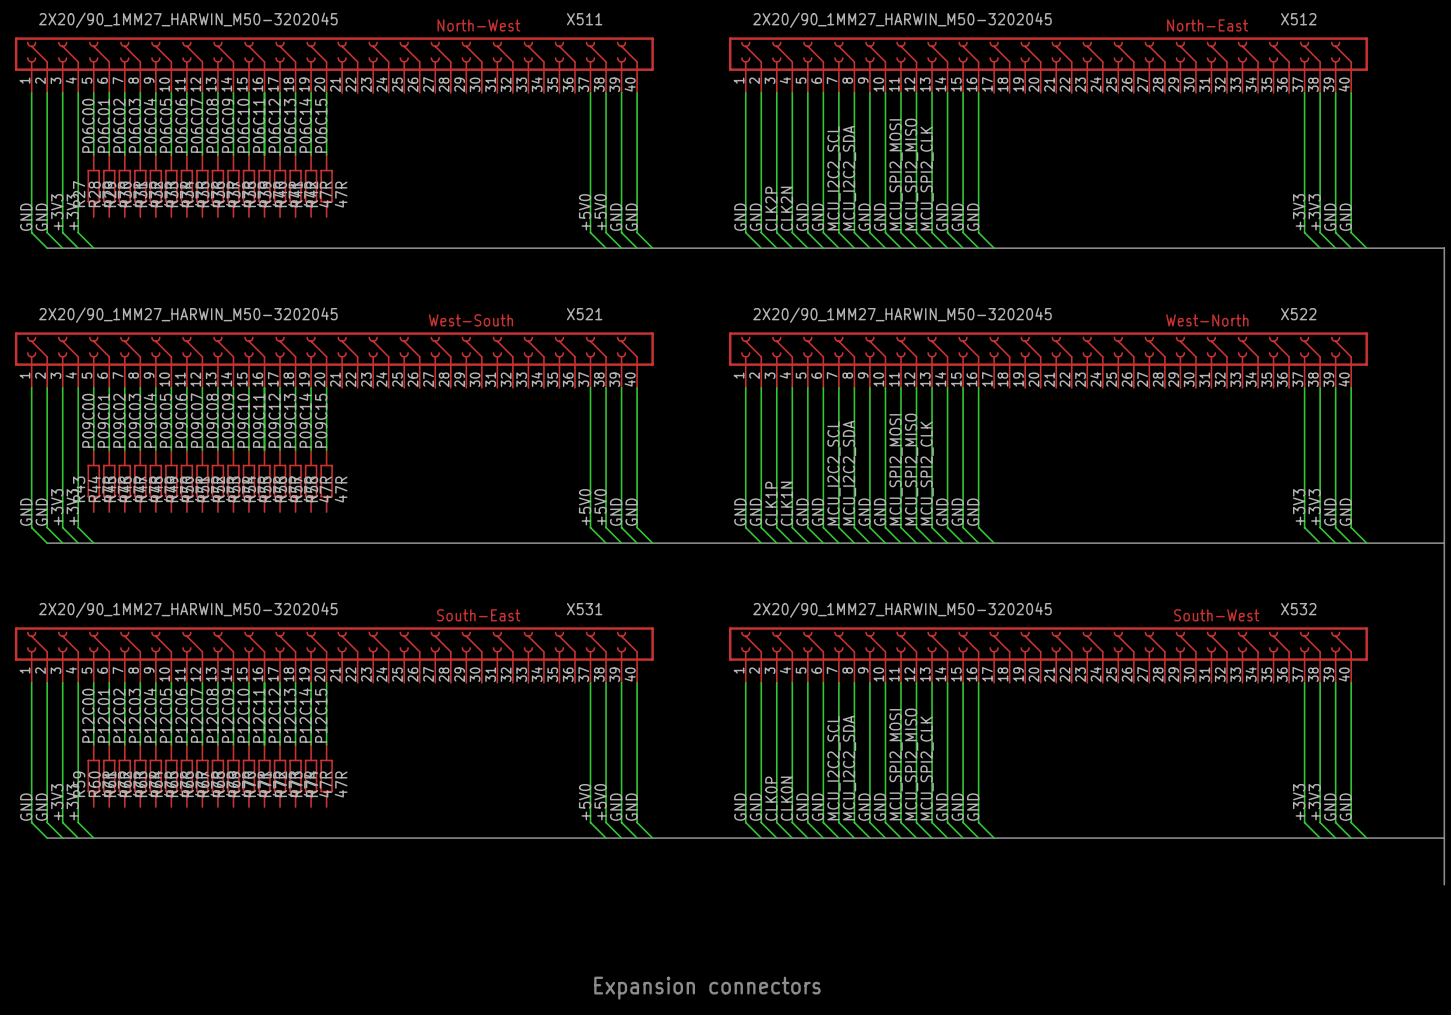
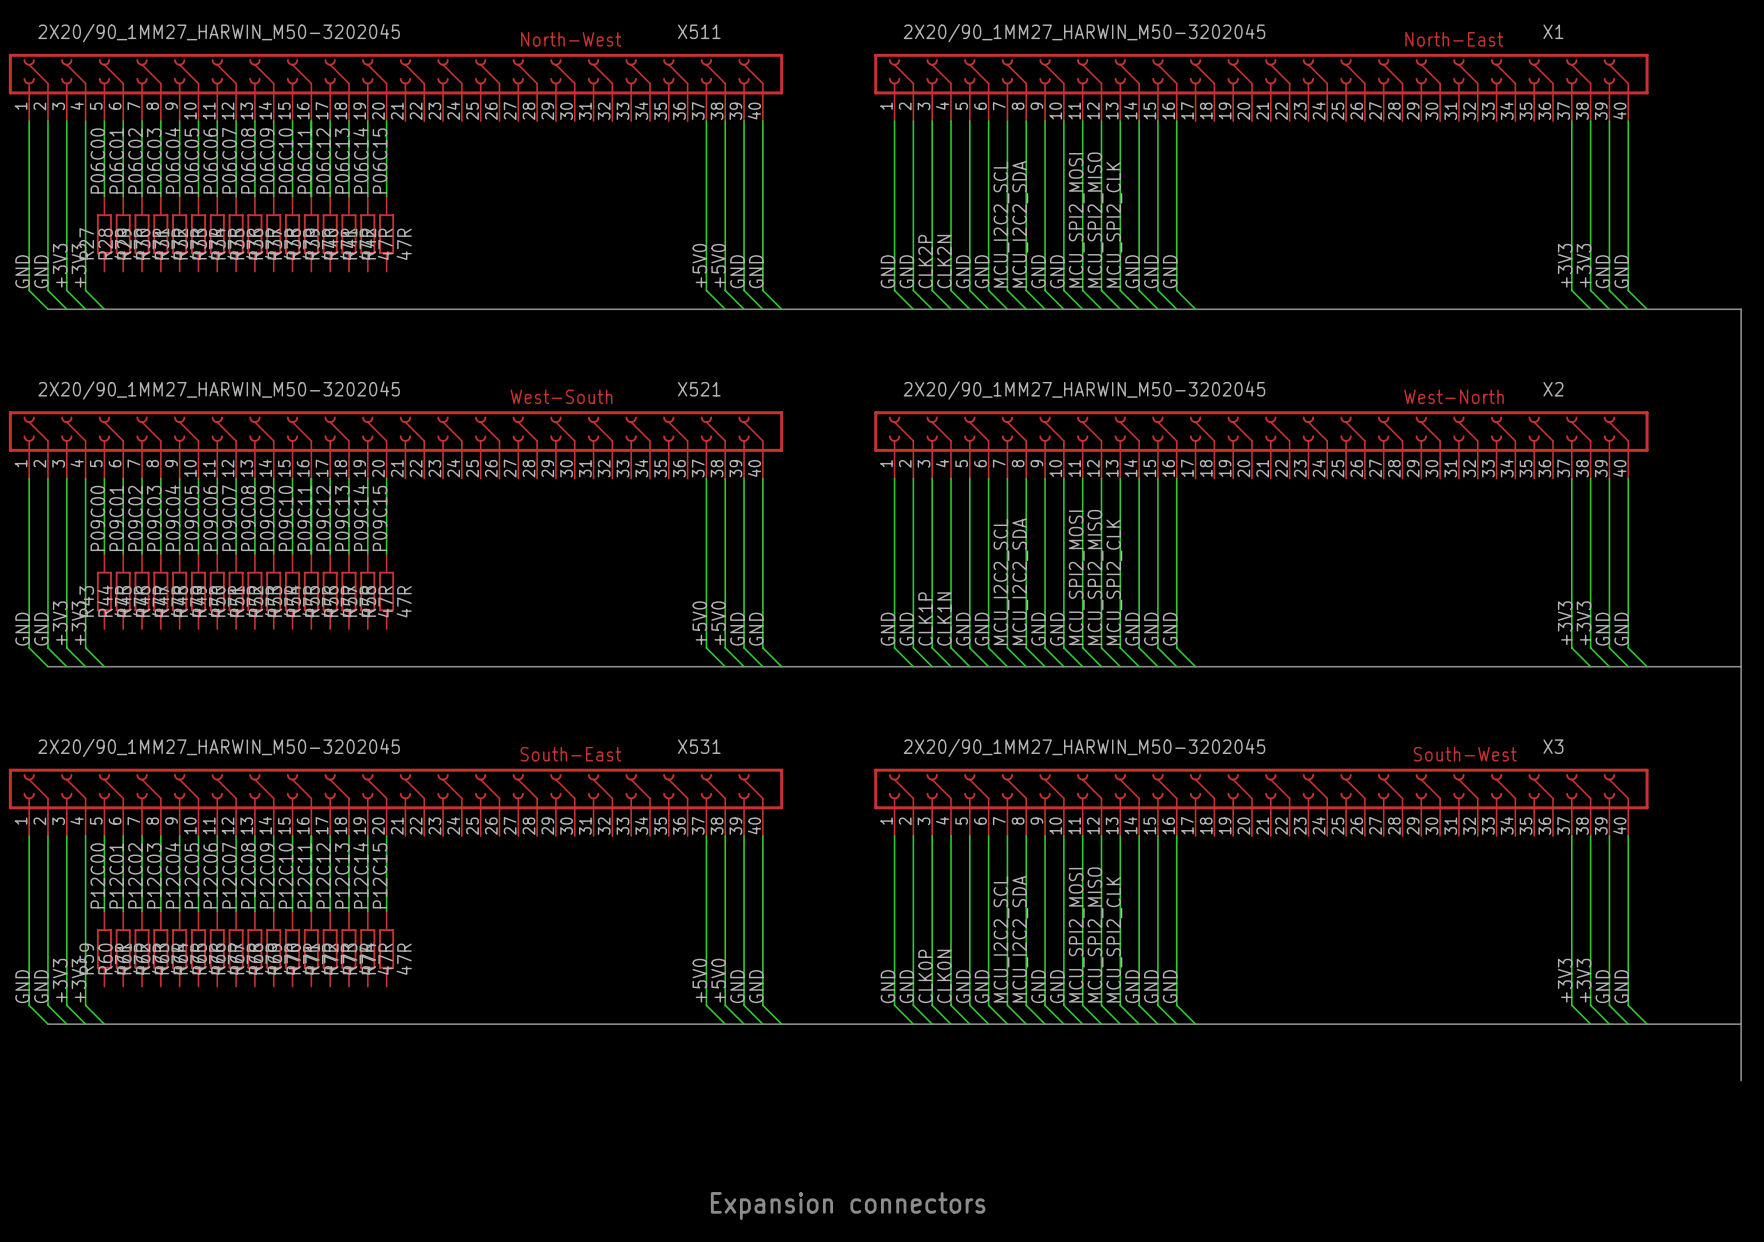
X512 name: X512 (1298, 19) -> X1 (1553, 31)
X522 name: X522 (1298, 314) -> X2 (1553, 389)
X532 name: X532 (1298, 609) -> X3 (1553, 746)

